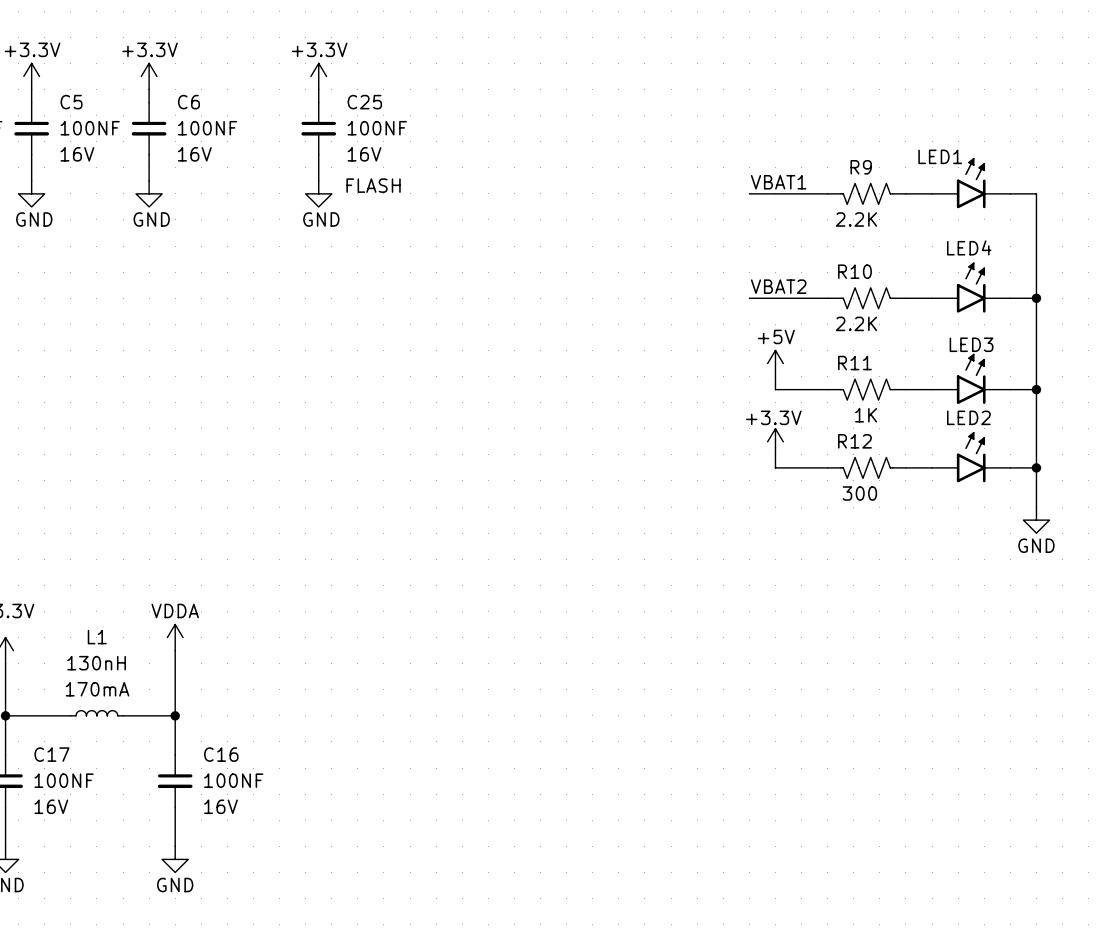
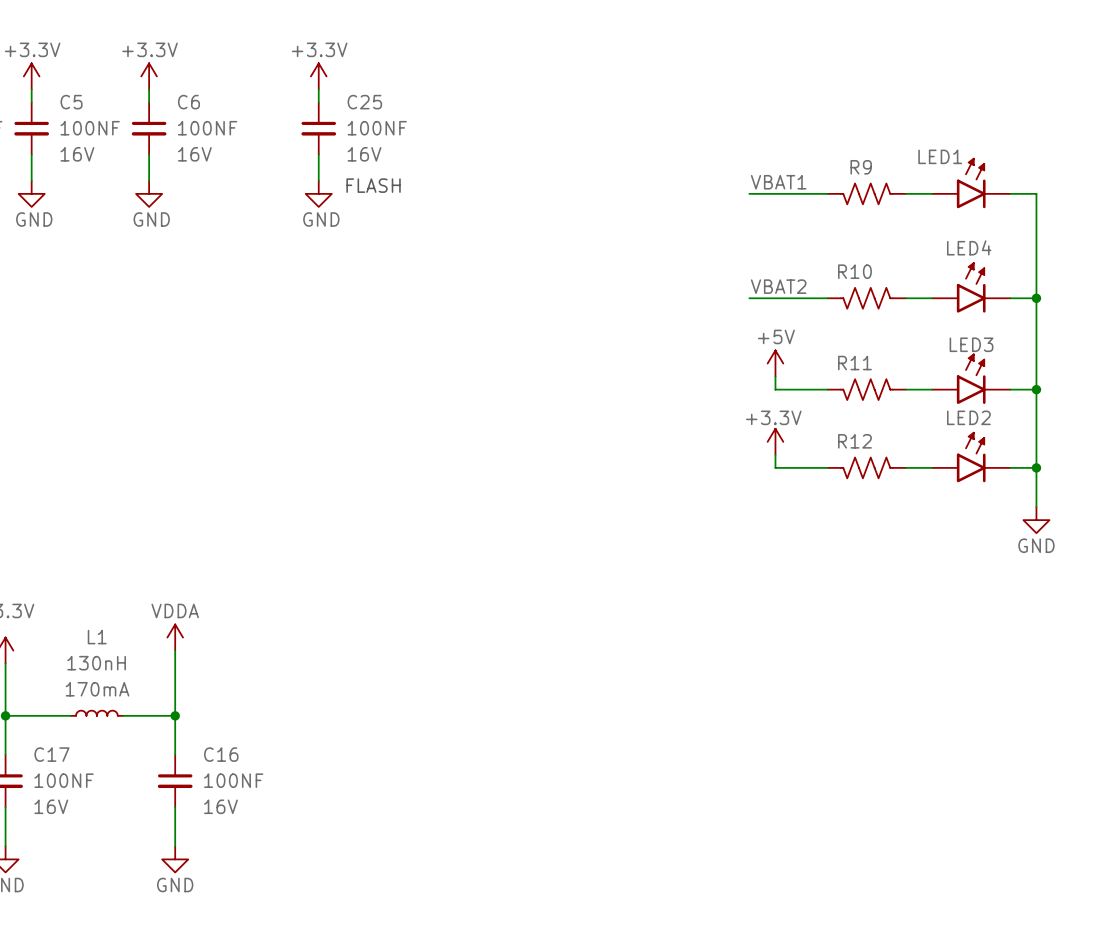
R9 value: 2.2K (856, 219) -> none
R10 value: 2.2K (856, 323) -> none
R11 value: 1K (866, 415) -> none
R12 value: 300 (859, 493) -> none

